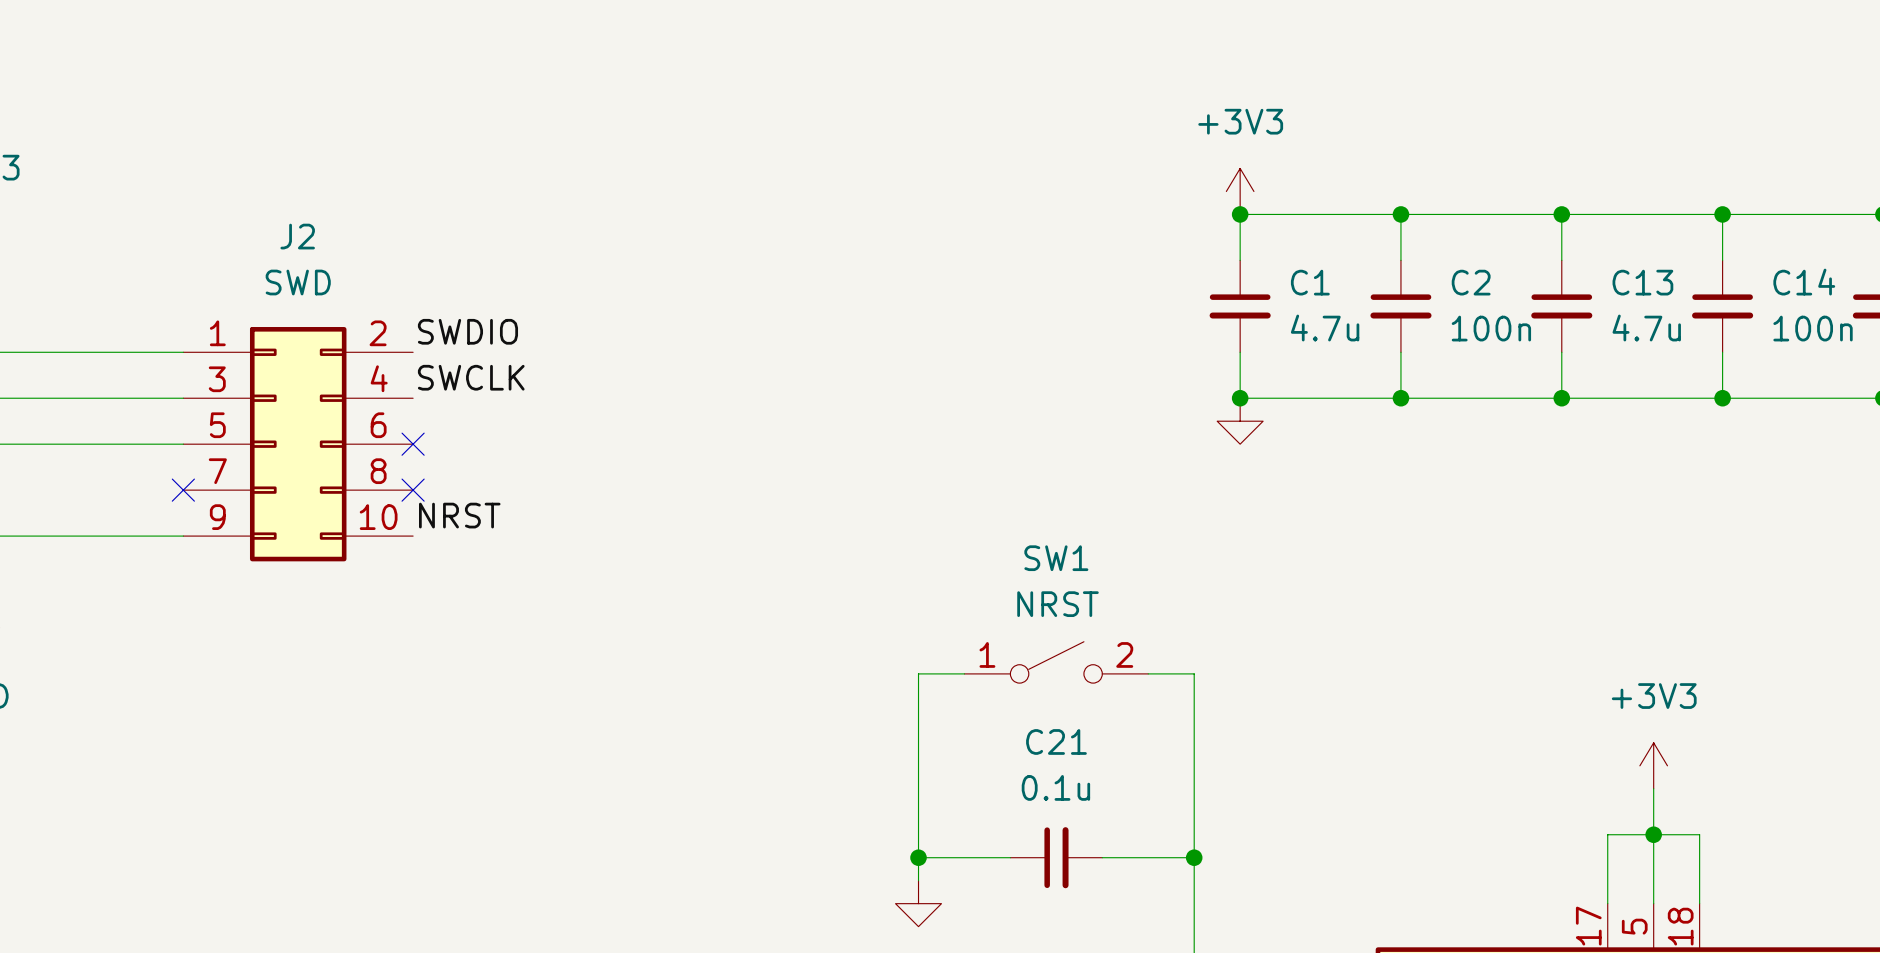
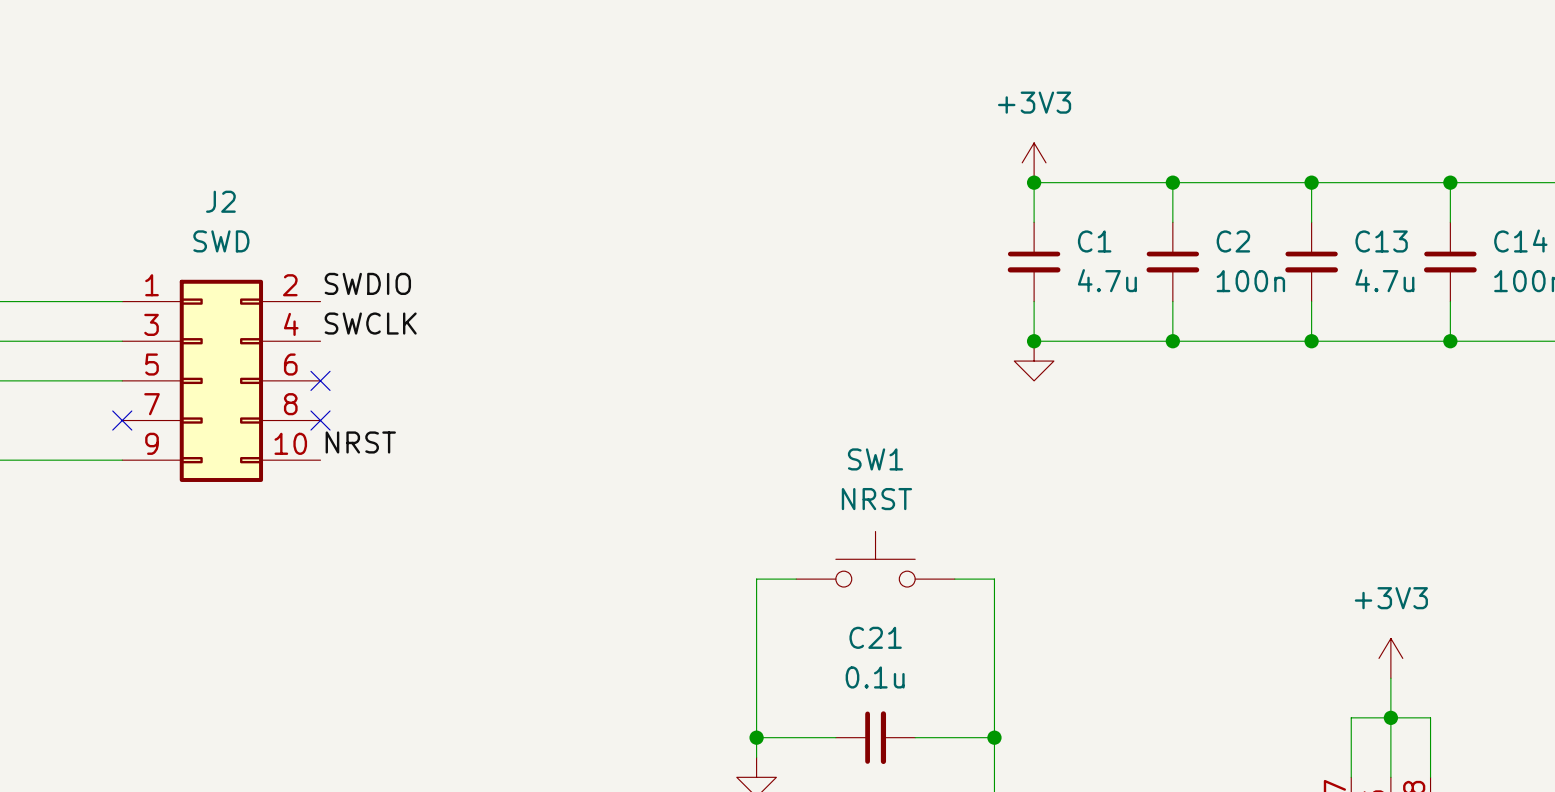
SW1 symbol: [964, 641, 1149, 684] -> [796, 531, 955, 588]

